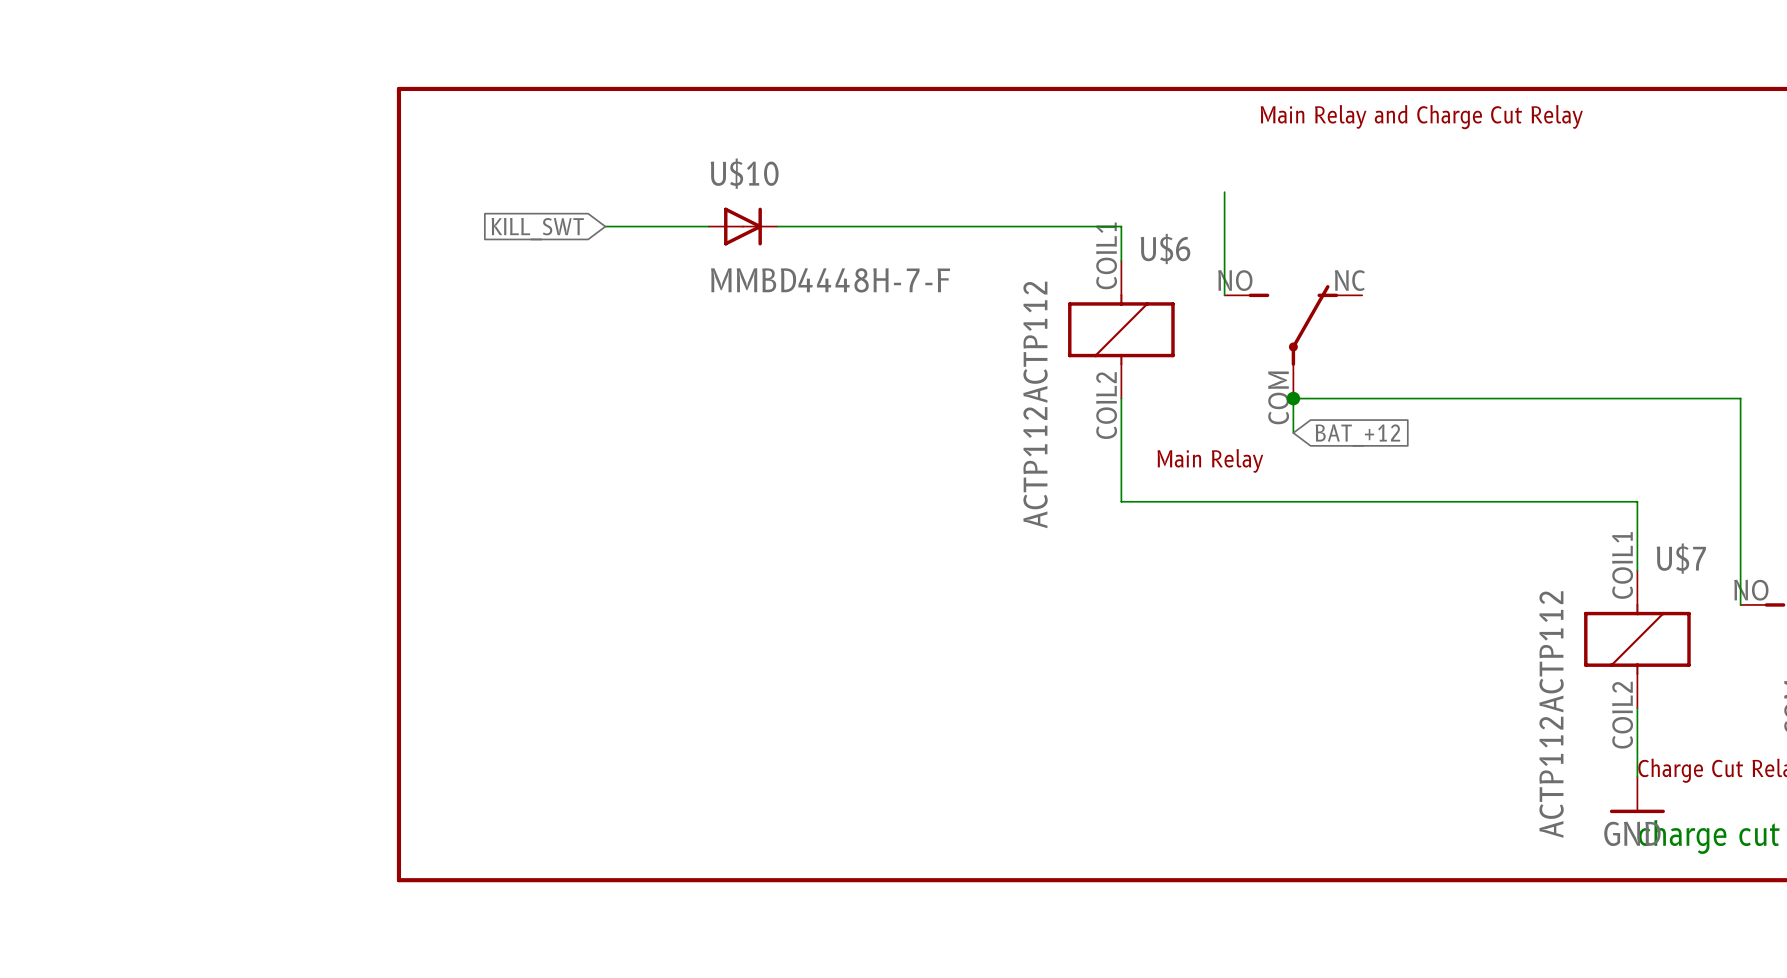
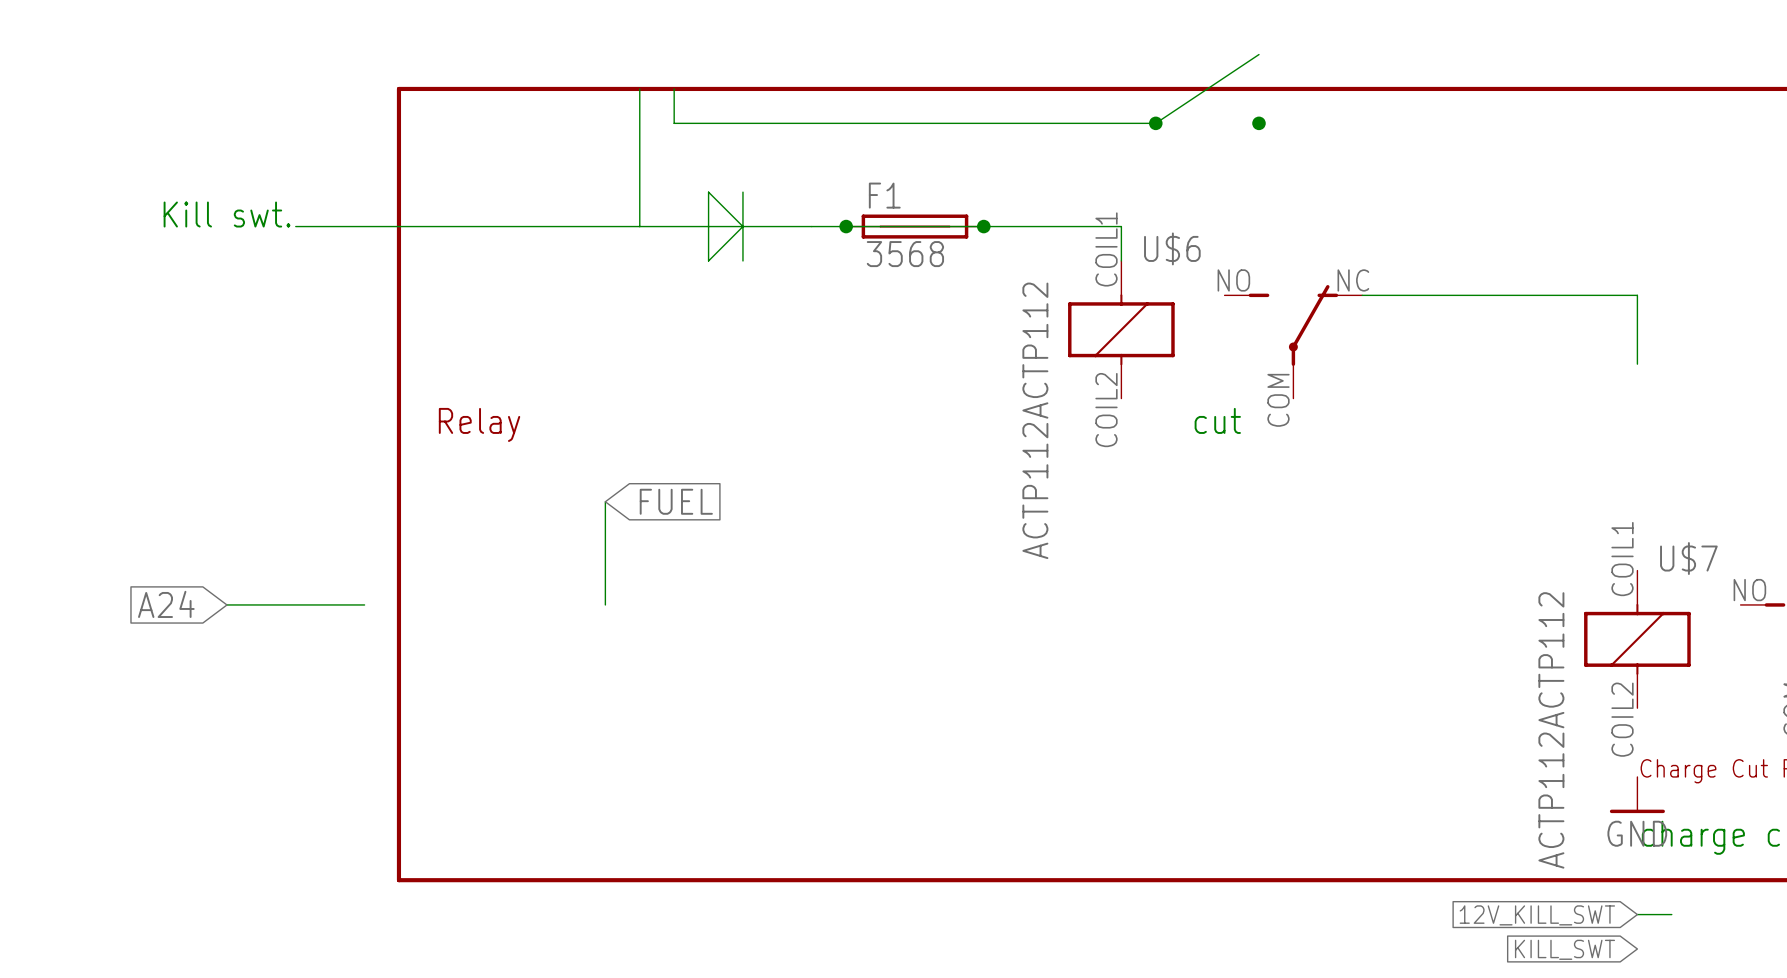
wire: none -> (1258, 54) (1155, 123) (674, 123) (674, 88)
wire: none -> (639, 88) (639, 226)
text: Main Relay and Charge Cut Relay (1421, 117) -> none
junction: none -> (1155, 123)
junction: none -> (1258, 123)
wire: none -> (708, 192) (708, 260) (742, 226) (708, 192)
wire: none -> (742, 192) (742, 260)
wire: (1224, 192) (1224, 295) -> none
text: none -> Kill swt. (227, 214)
wire: none -> (295, 226) (605, 226)
U$10: MMBD4448H-7-F (742, 226) -> none
junction: none -> (846, 226)
F1: none -> 3568 (914, 226)
junction: none -> (983, 226)
global label: KILL_SWT (537, 229) -> none
wire: none -> (1362, 295) (1637, 295) (1637, 364)
wire: (1121, 398) (1121, 501) (1637, 501) (1637, 570) -> none
junction: (1293, 398) -> none
text: none -> cut (1217, 420)
text: none -> Relay (479, 424)
wire: (1293, 432) (1293, 398) (1740, 398) (1740, 604) -> none
global label: BAT_+12 (1357, 435) -> none
text: Main Relay (1210, 460) -> none
wire: none -> (605, 501) (605, 604)
global label: none -> FUEL (676, 501)
global label: none -> A24 (166, 604)
wire: none -> (226, 604) (364, 604)
wire: (1637, 708) (1637, 776) -> none
wire: none -> (1637, 914) (1671, 914)
global label: none -> 12V_KILL_SWT (1537, 915)
global label: none -> KILL_SWT (1564, 949)

